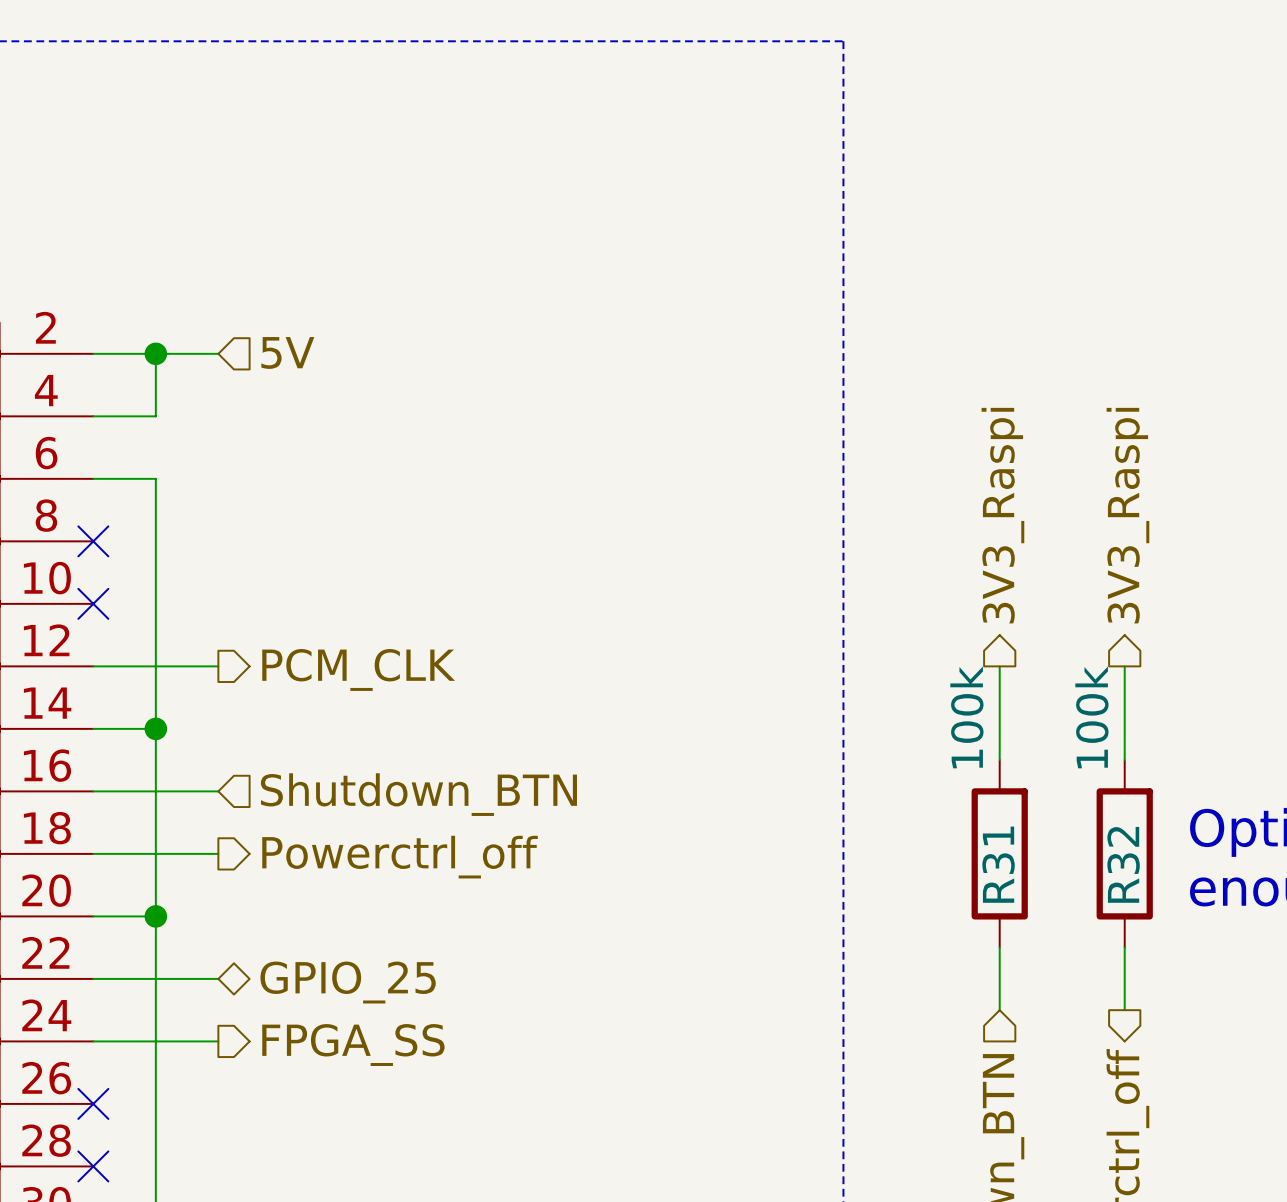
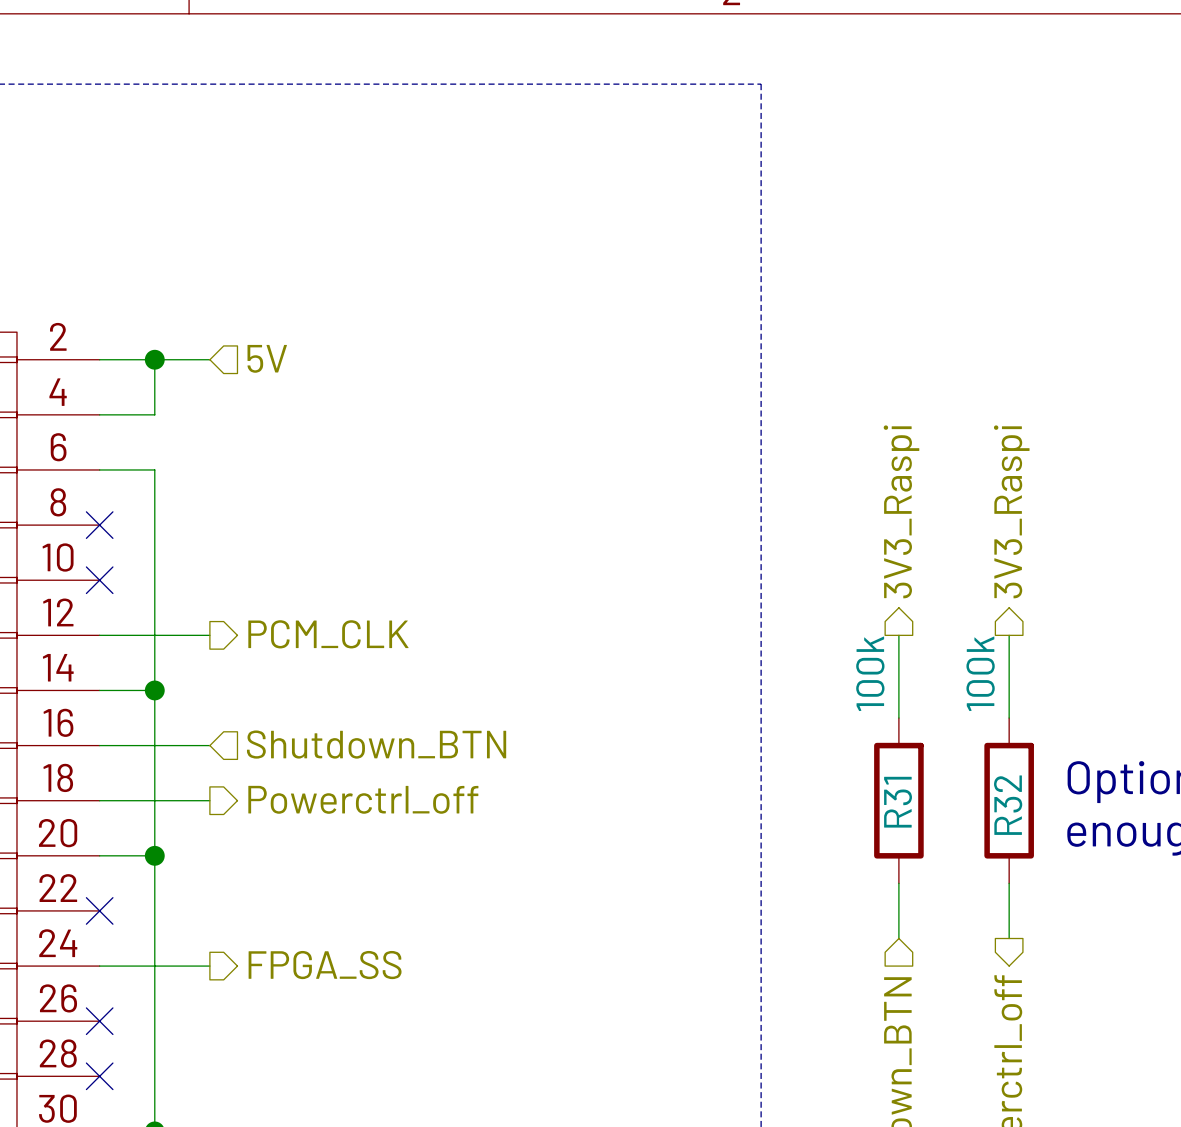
wire: (93, 978) (218, 978) -> none
no-connect mark: none -> (99, 910)
hierarchical label: GPIO_25 (348, 982) -> none

